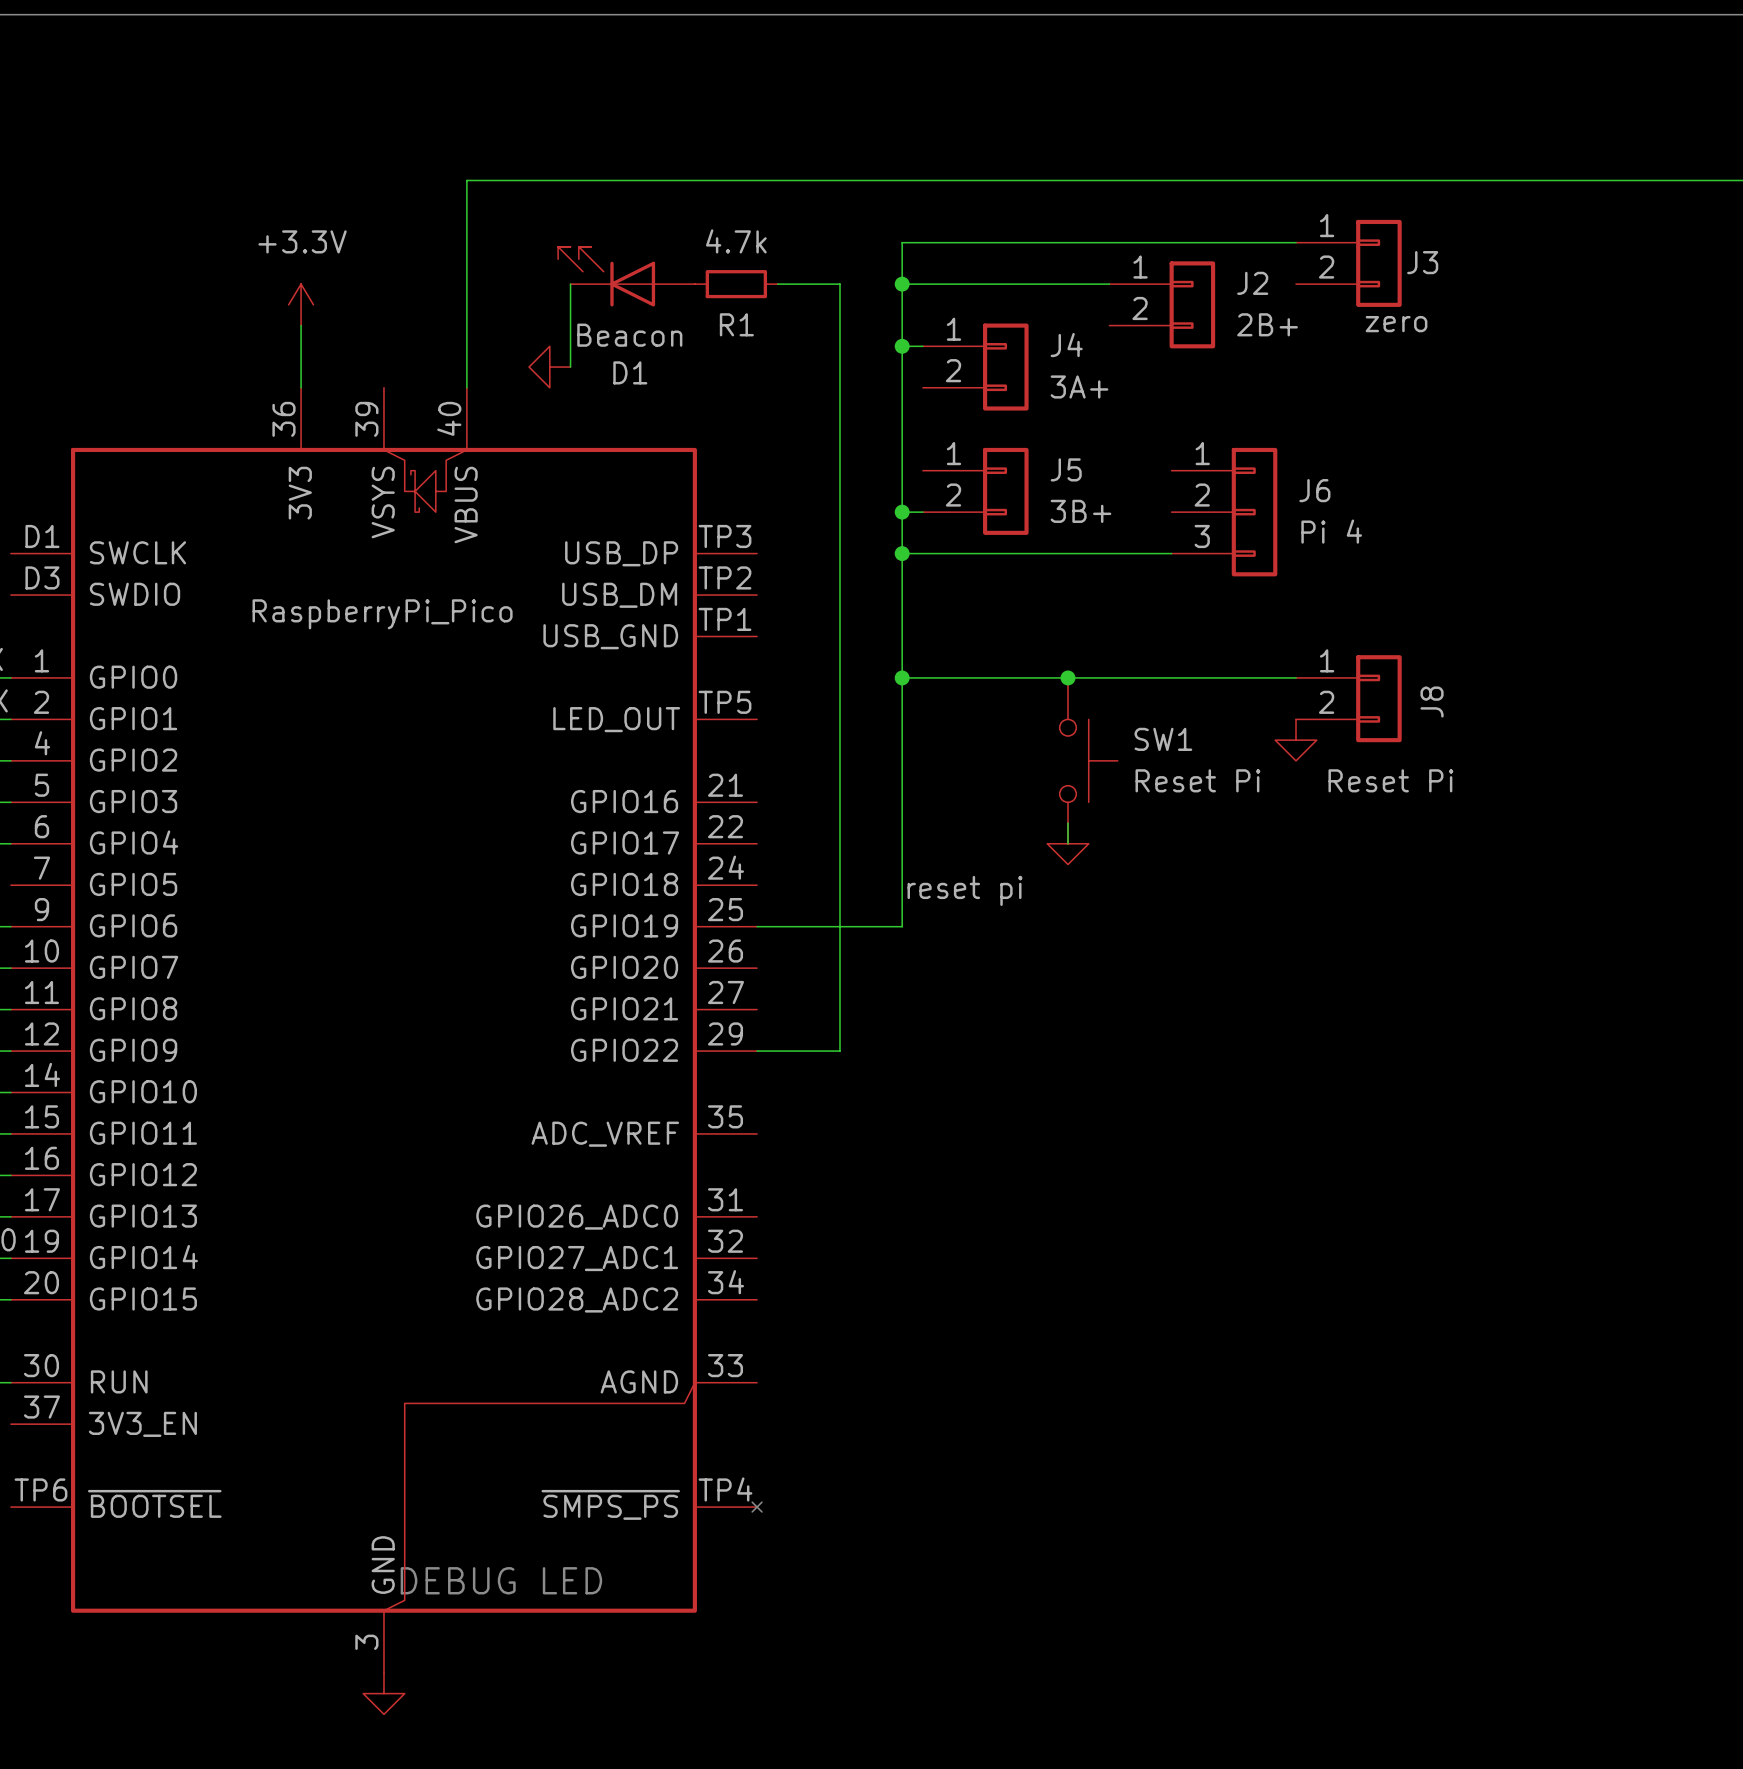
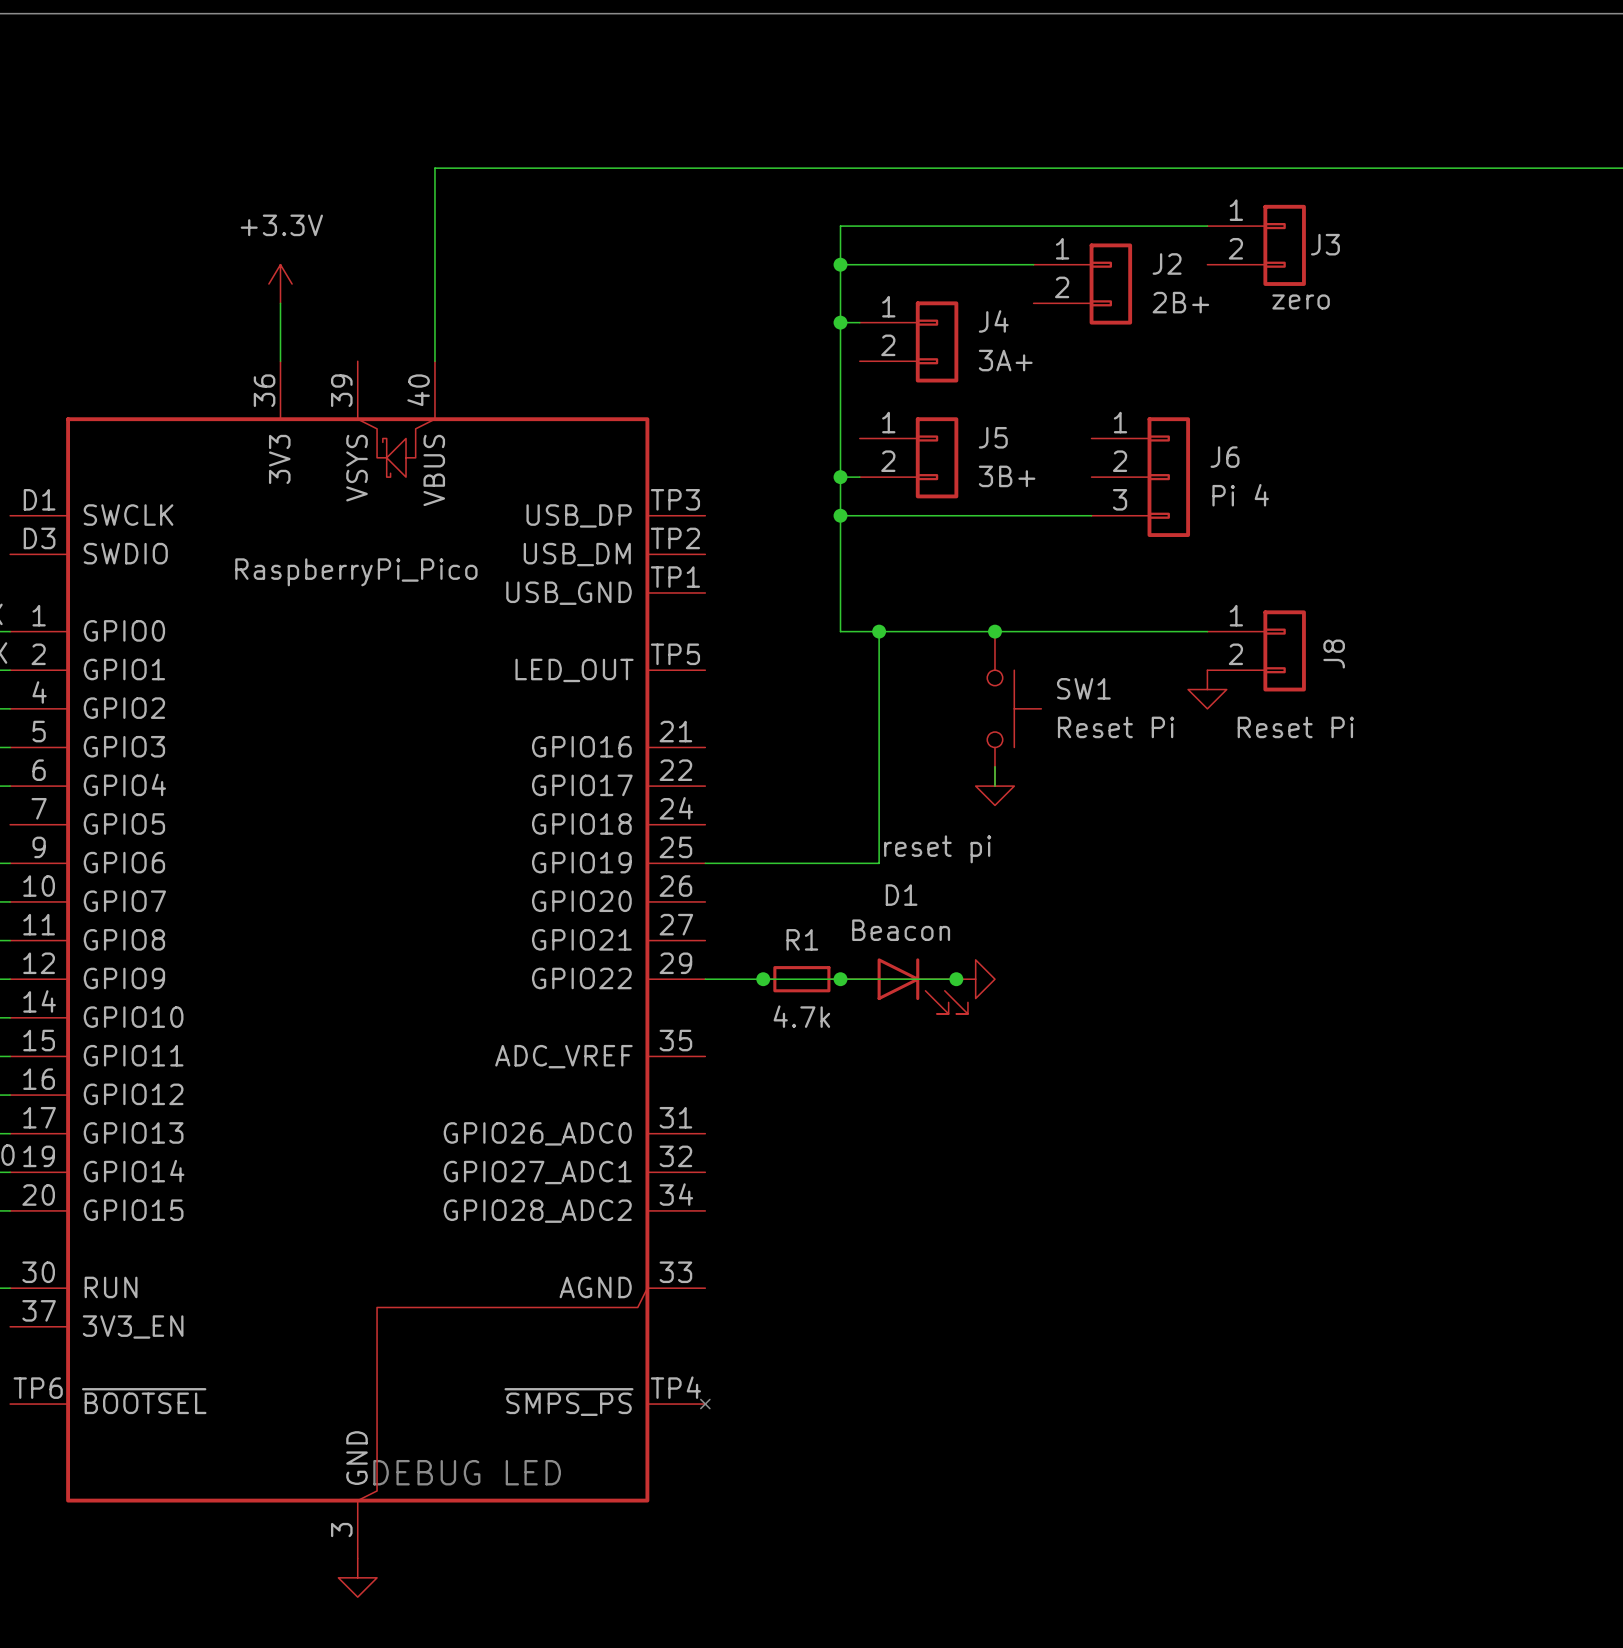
R1 value position: 4.7k (736, 241) -> 4.7k (801, 1016)
D1 rotation: 0° (606, 276) -> 180° (922, 986)
D1 position: (626, 276) -> (904, 986)
wire: (570, 284) (570, 367) -> none
R1 position: (736, 284) -> (801, 979)
wire: (777, 284) (839, 284) (839, 1051) -> (956, 979) (782, 979)
R1 name position: R1 (736, 324) -> R1 (802, 939)
power symbol: (549, 367) -> none
wire: (902, 677) (902, 926) -> (879, 631) (879, 863) (840, 863)
junction position: (902, 677) -> (879, 631)
label position: reset pi (965, 890) -> reset pi (937, 849)
junction: none -> (763, 979)
junction: none -> (840, 979)
junction: none -> (956, 979)
power symbol: none -> (975, 979)

